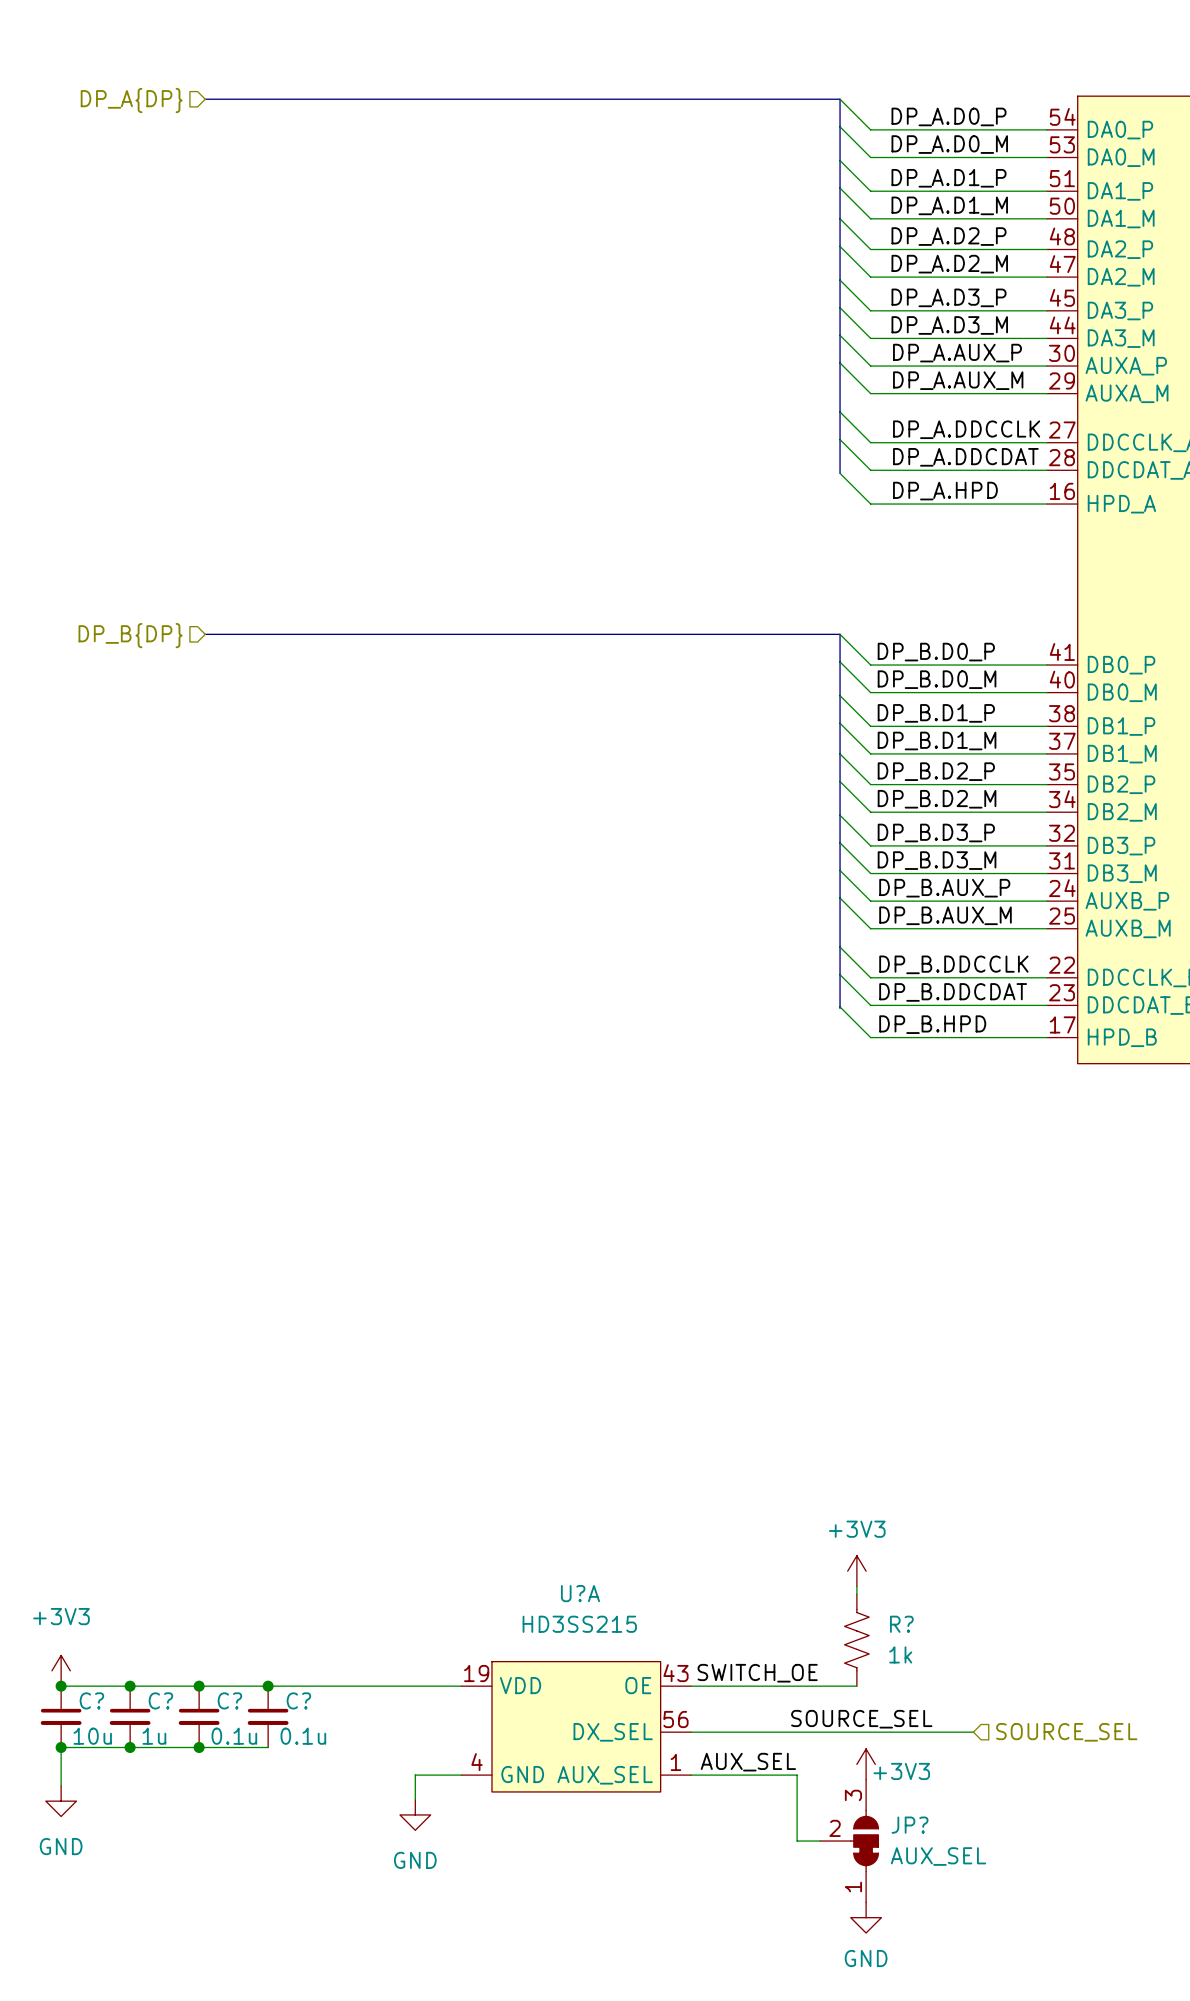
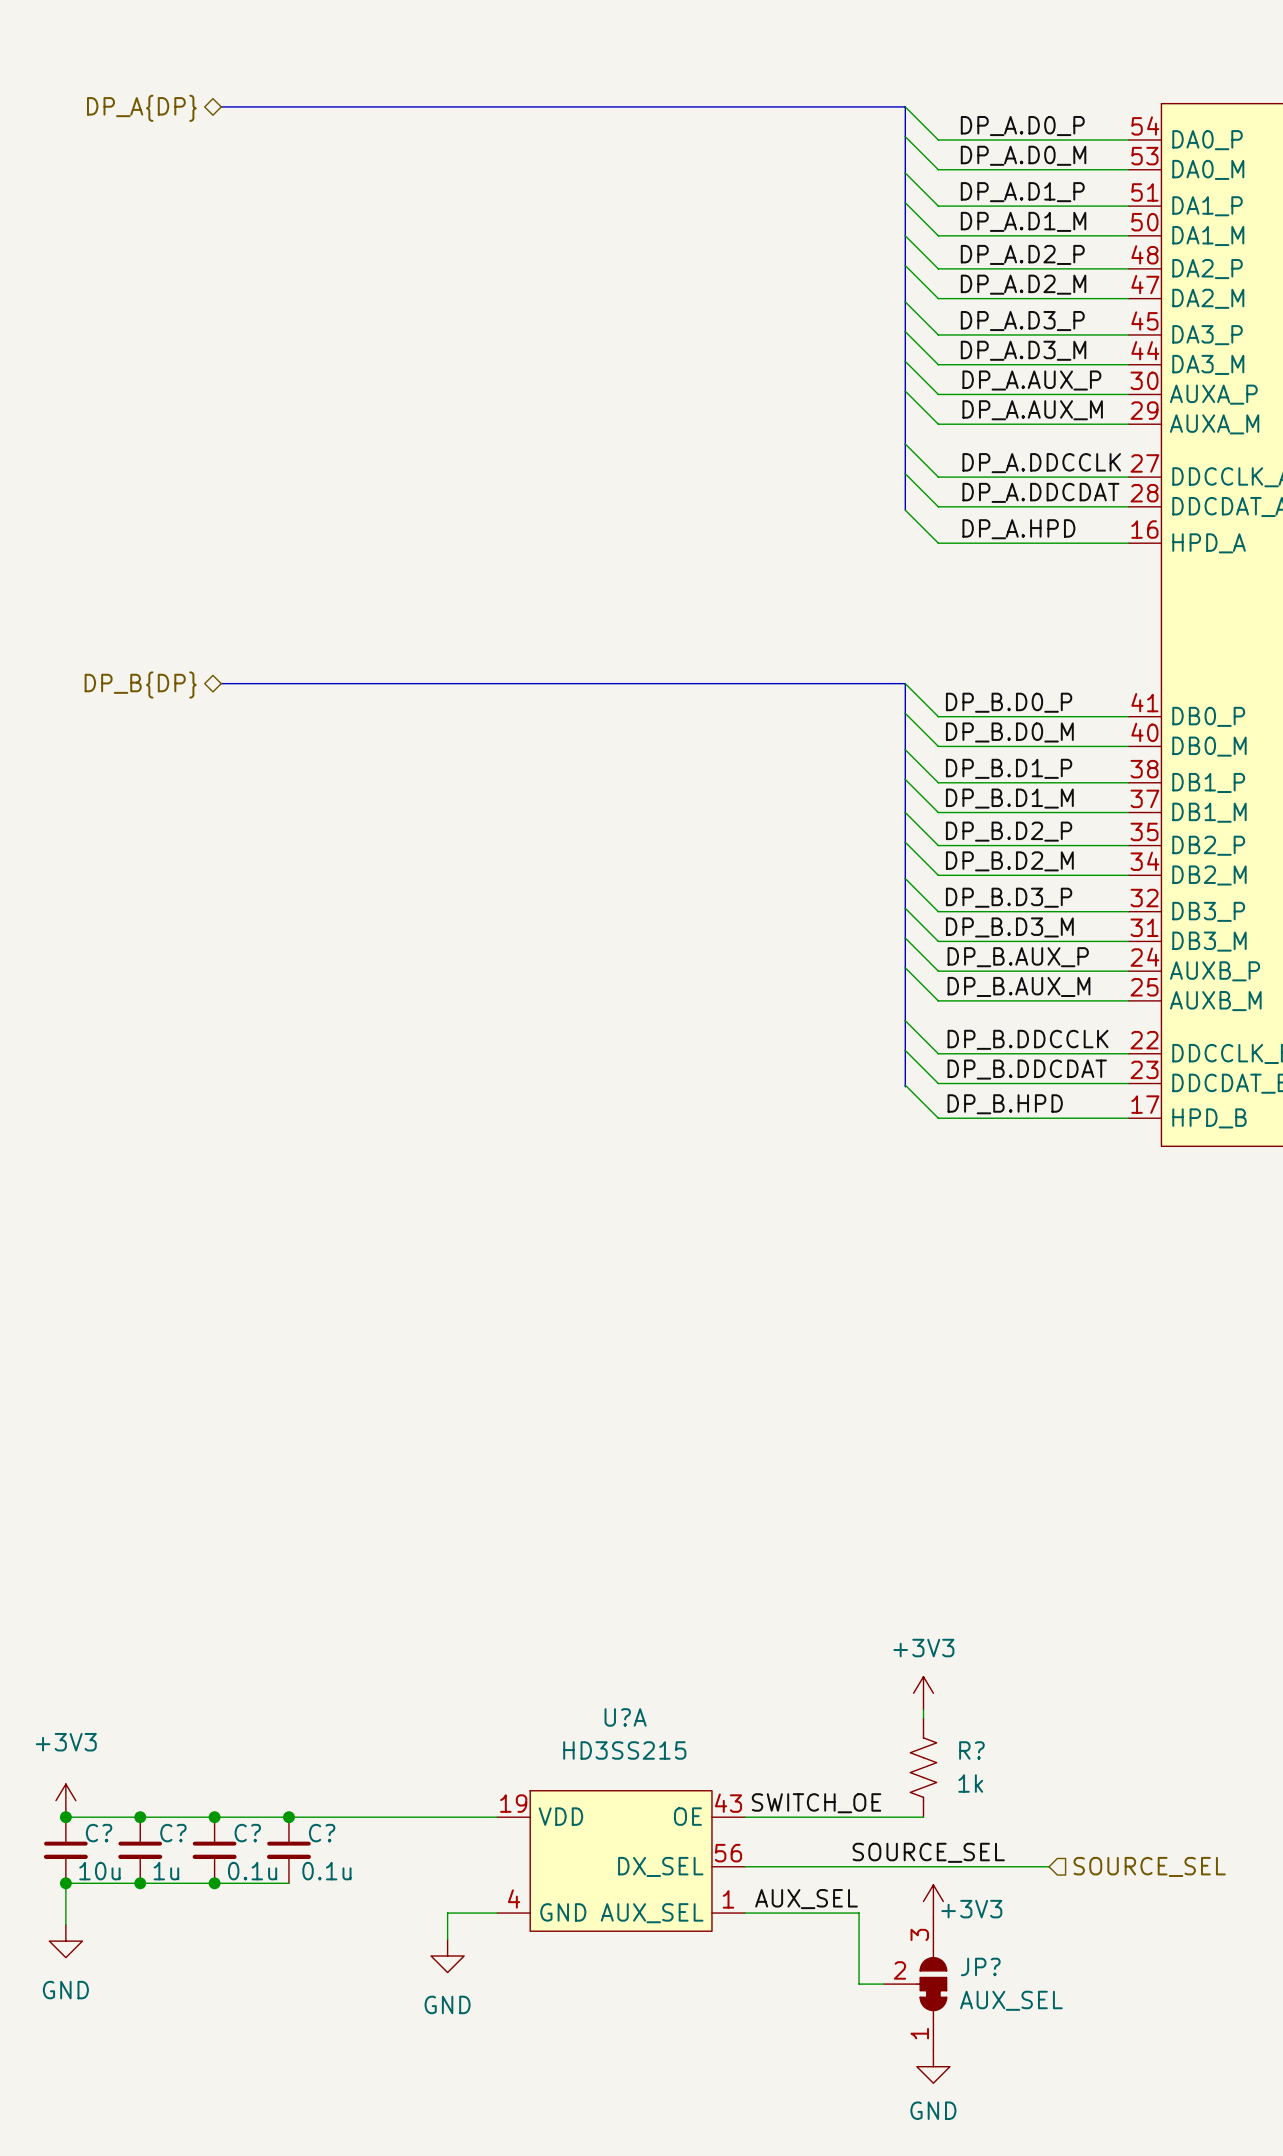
hierarchical label shape: input (131, 100) -> bidirectional (141, 108)
hierarchical label shape: input (130, 635) -> bidirectional (140, 684)

